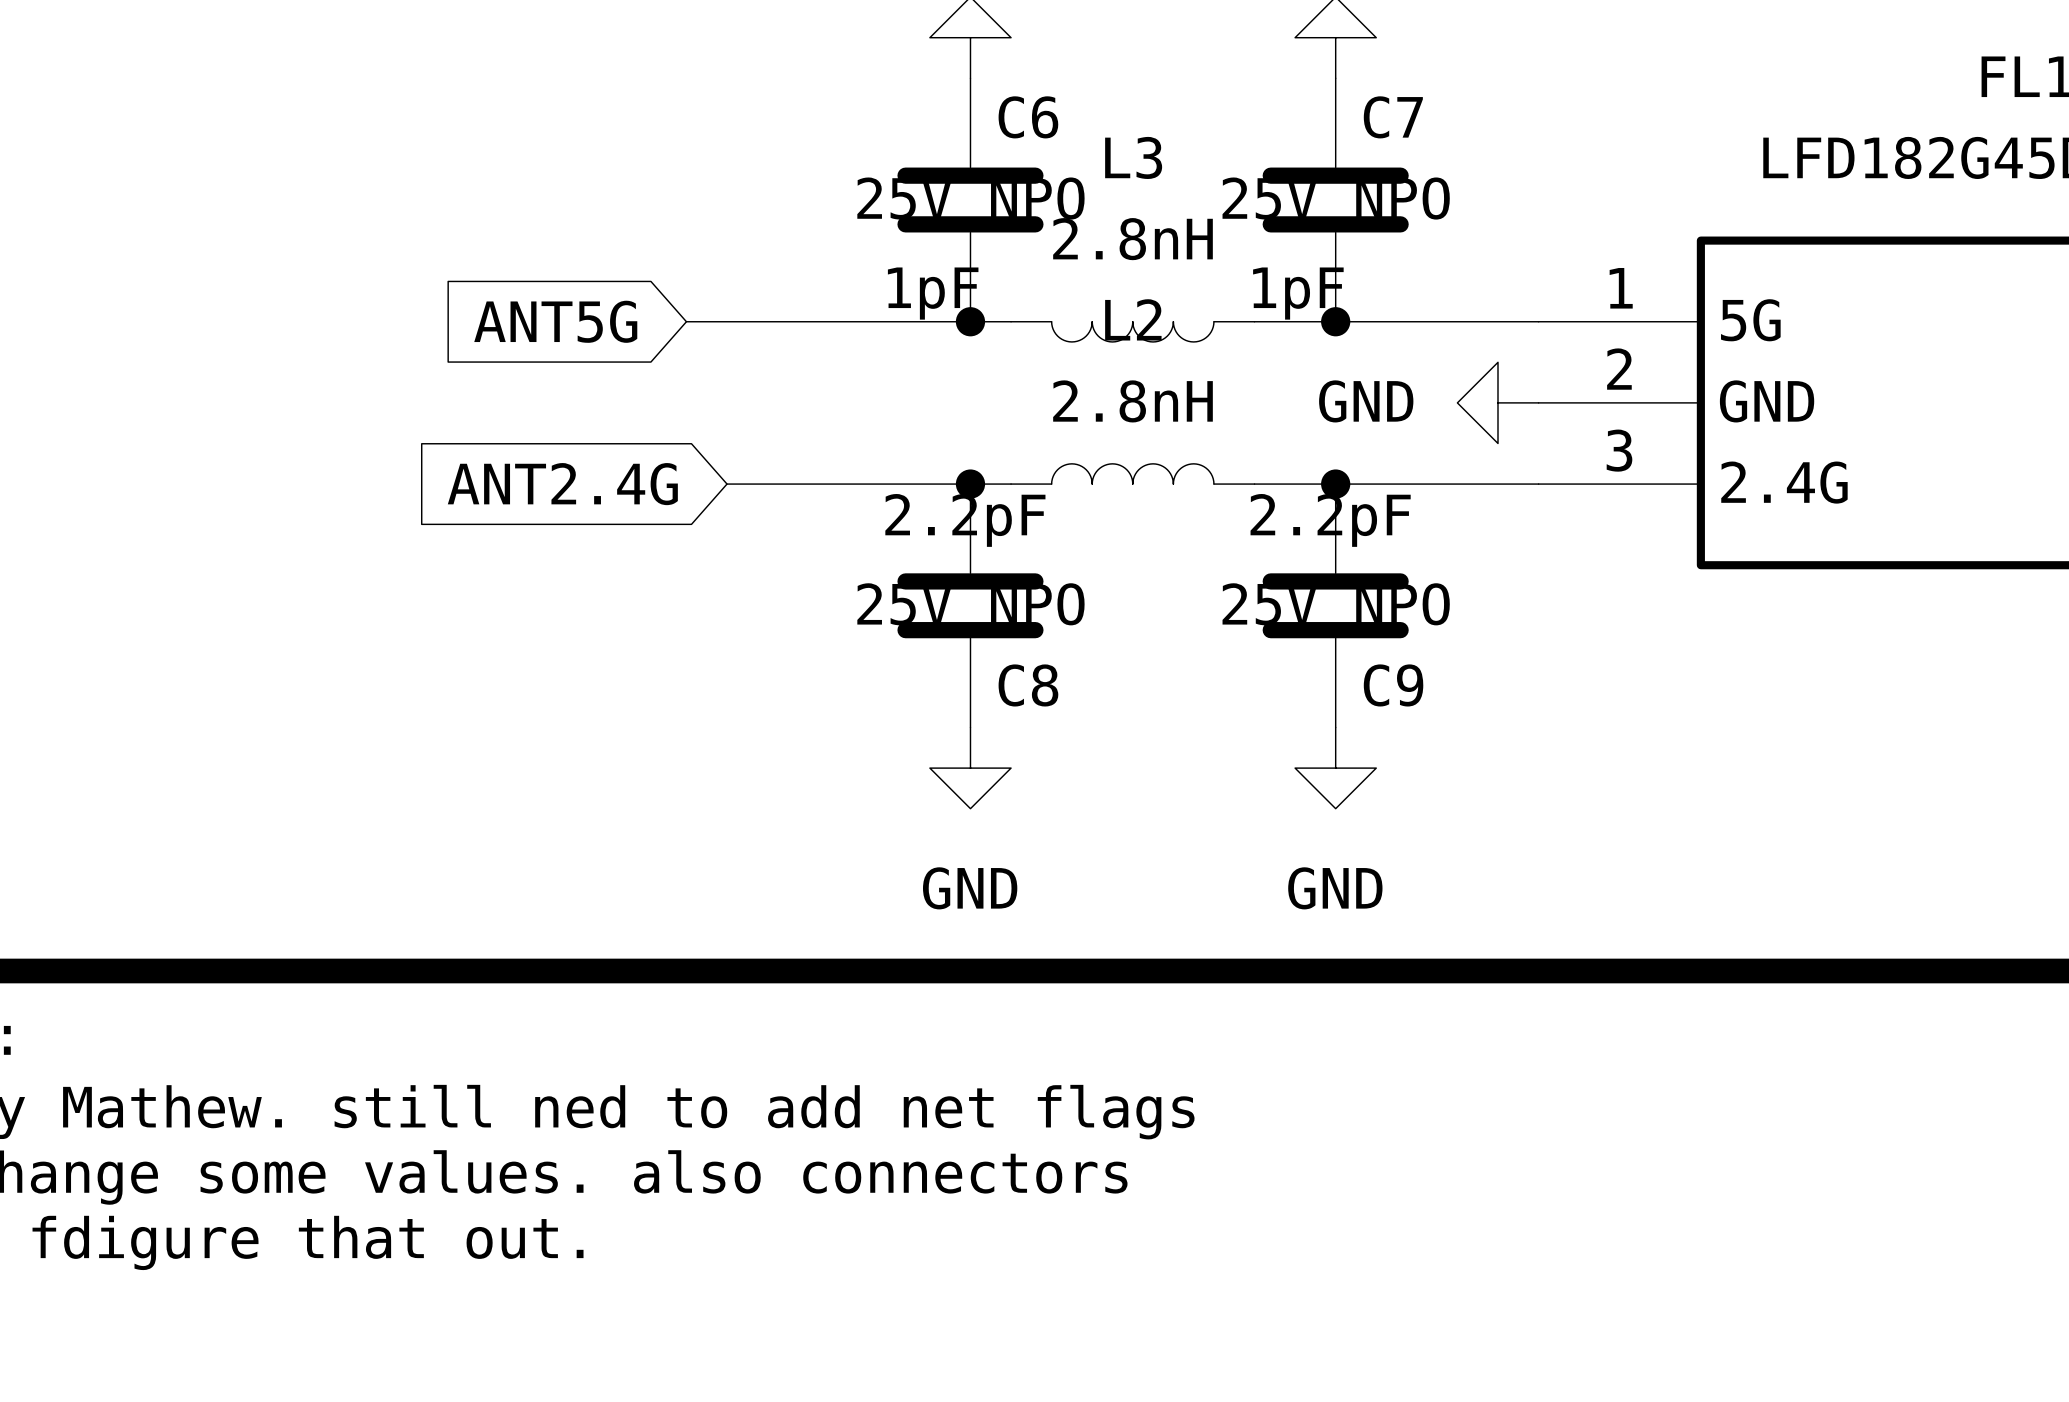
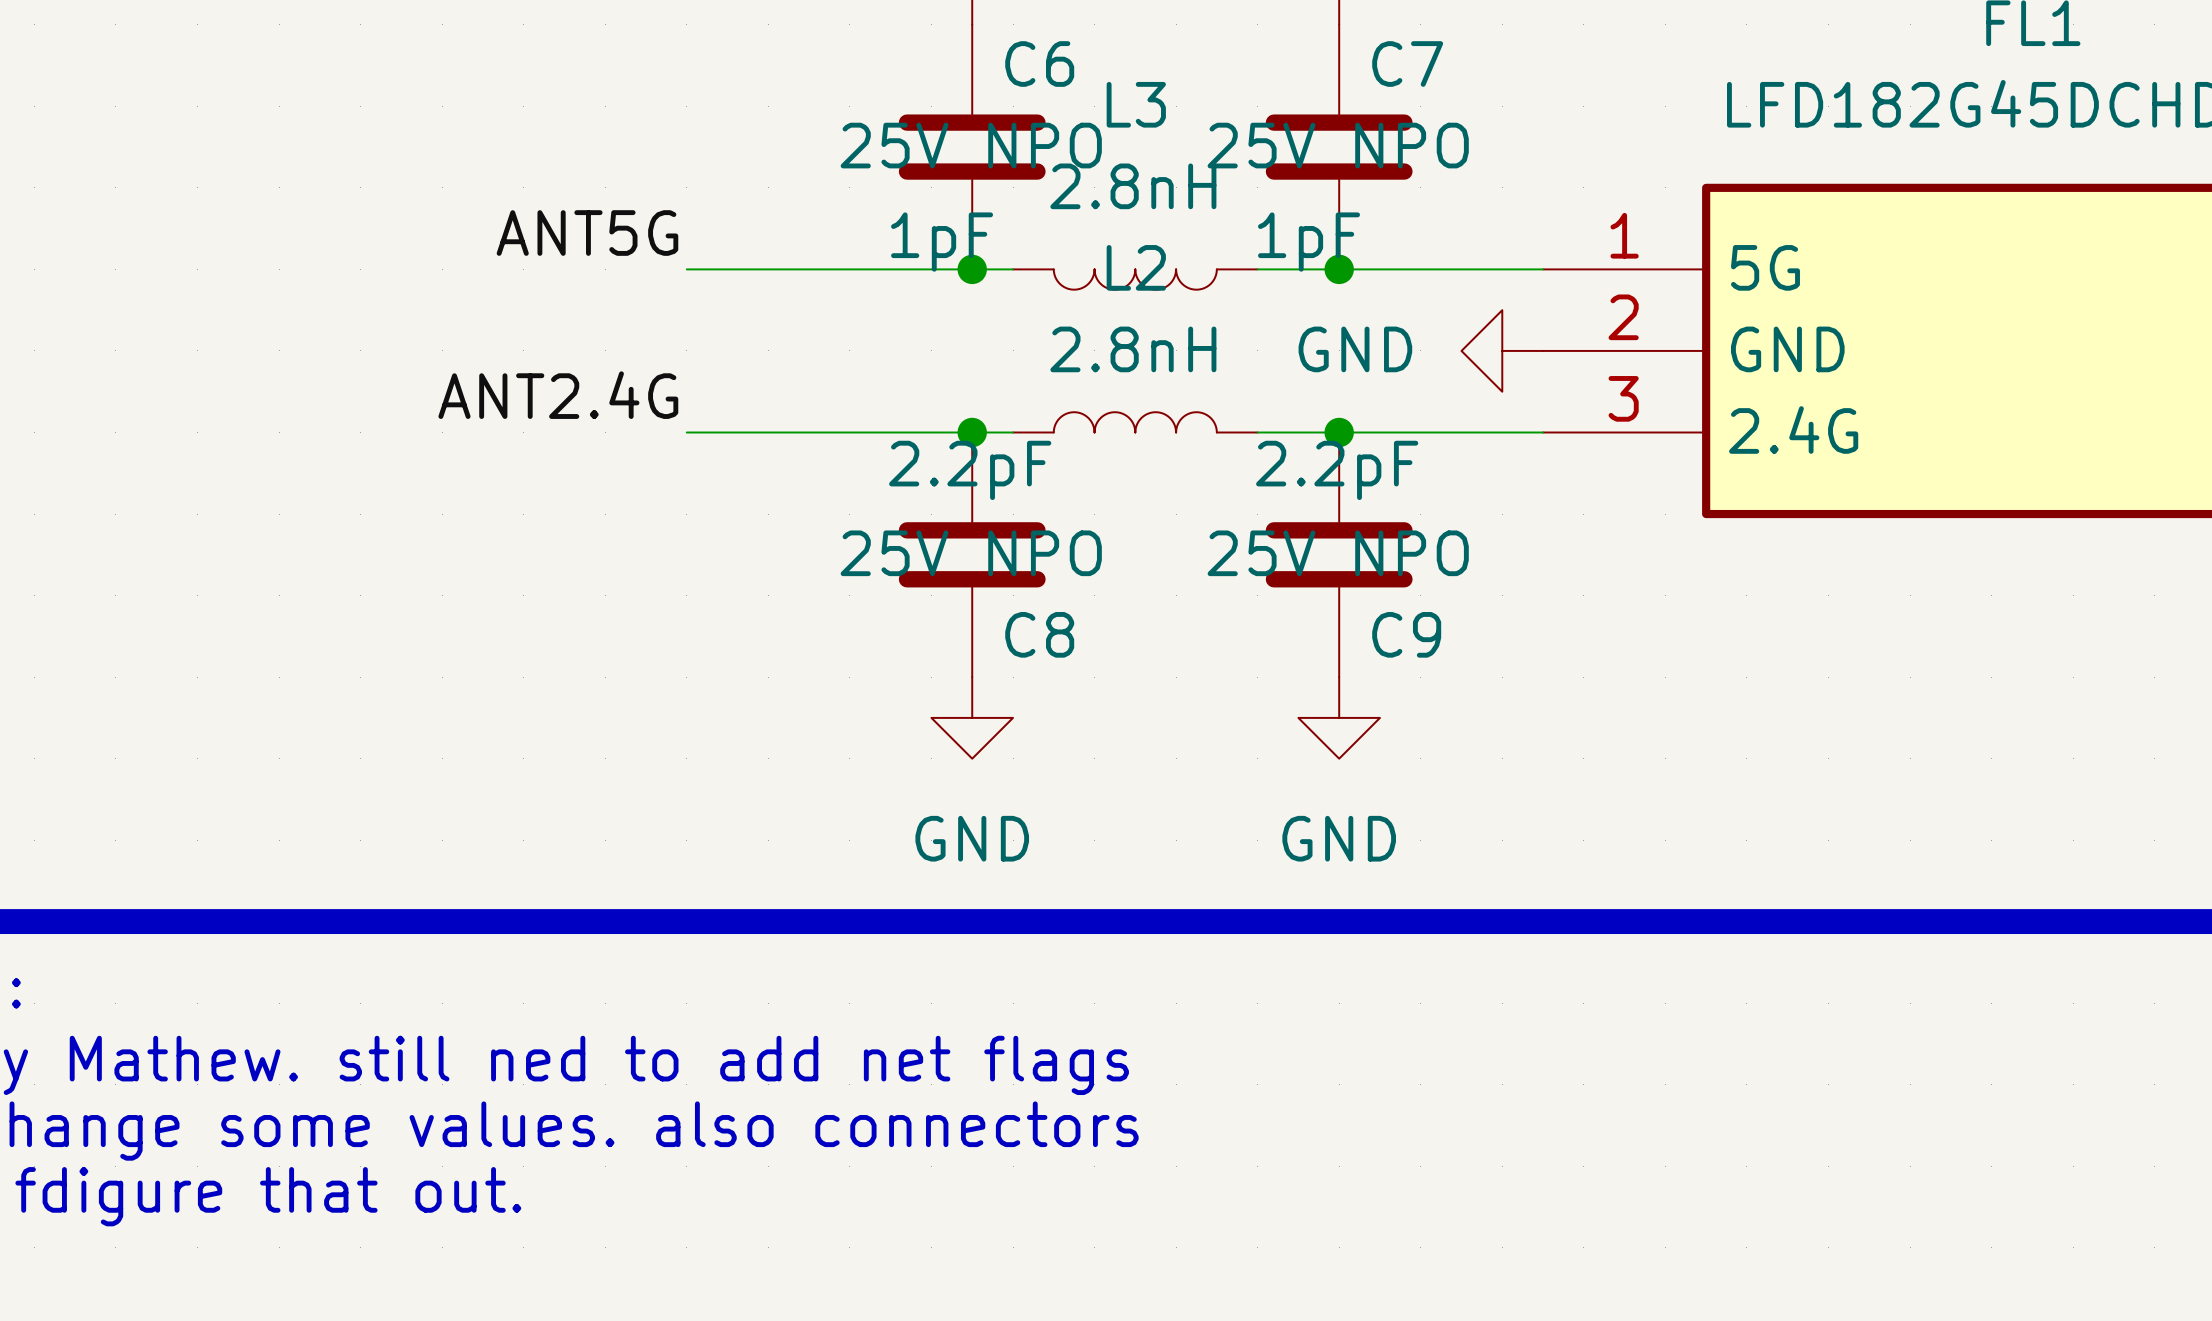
label: none -> ANT5G (587, 233)
global label: ANT5G (555, 321) -> none
label: none -> ANT2.4G (558, 395)
global label: ANT2.4G (562, 484) -> none
wire: none -> (686, 432) (727, 432)

